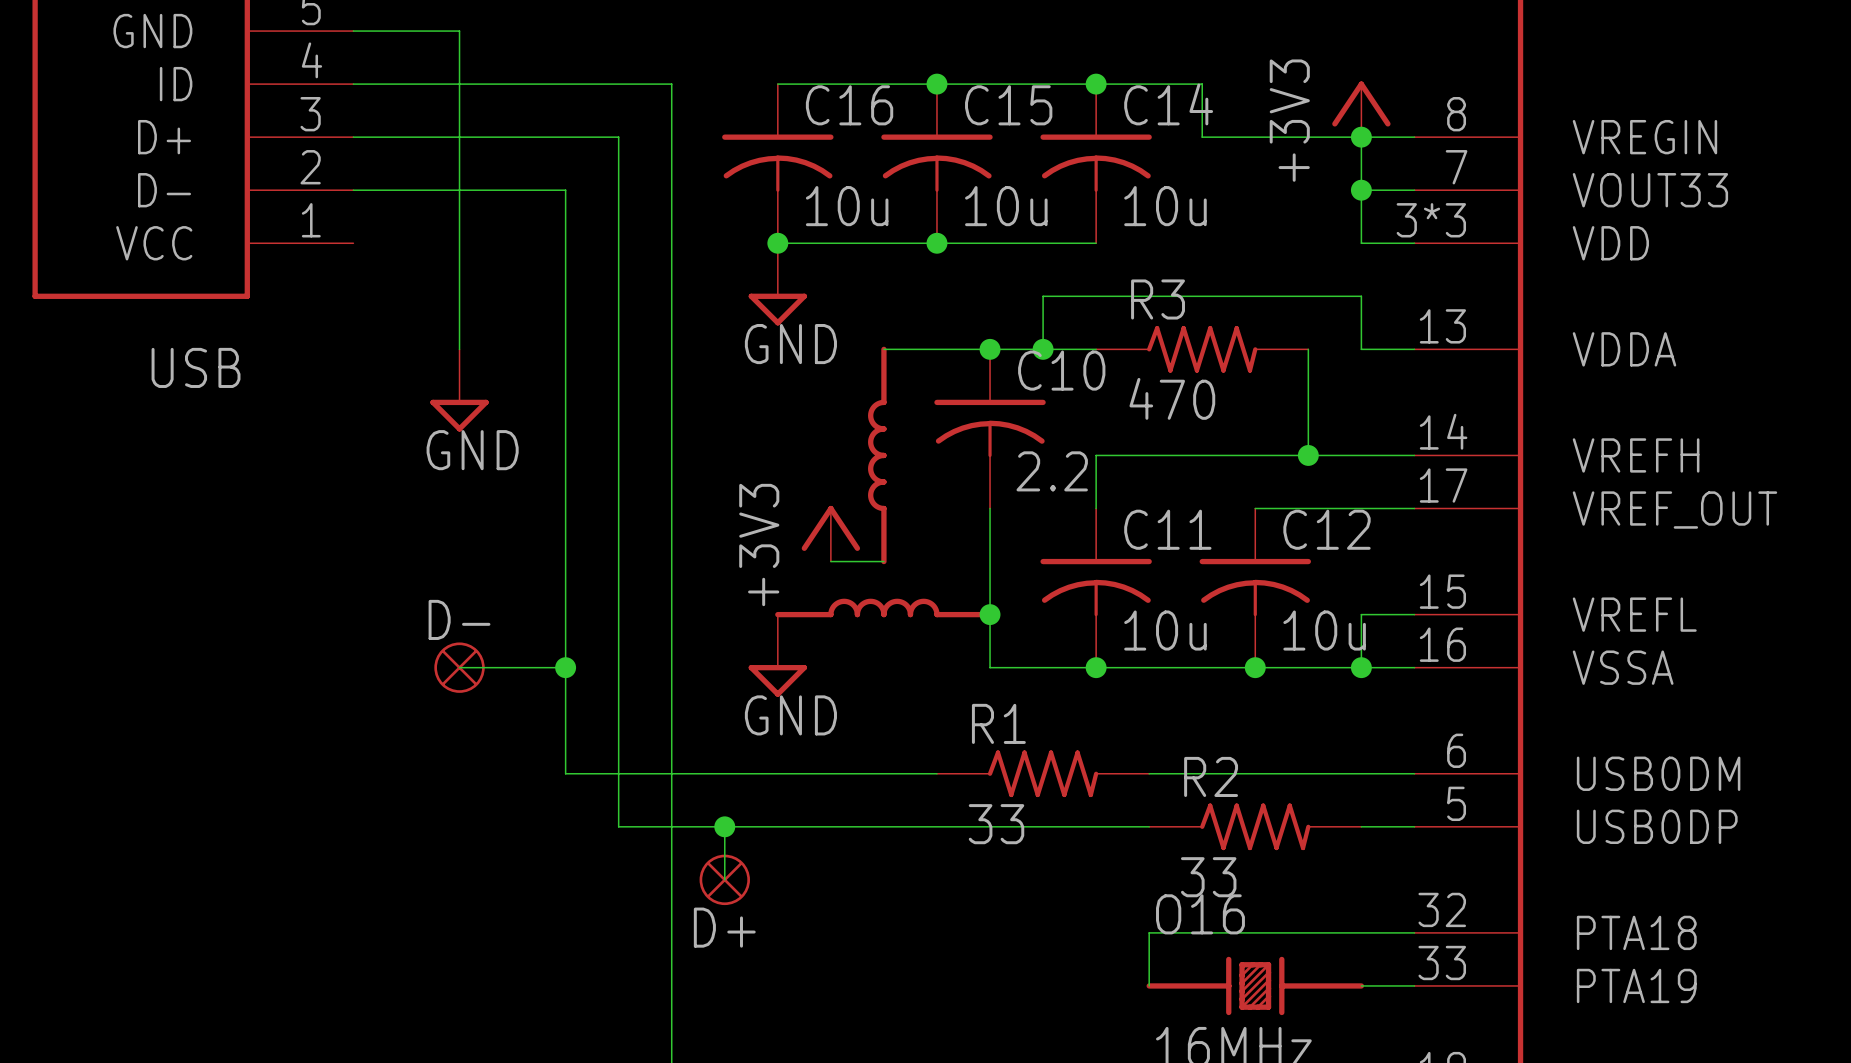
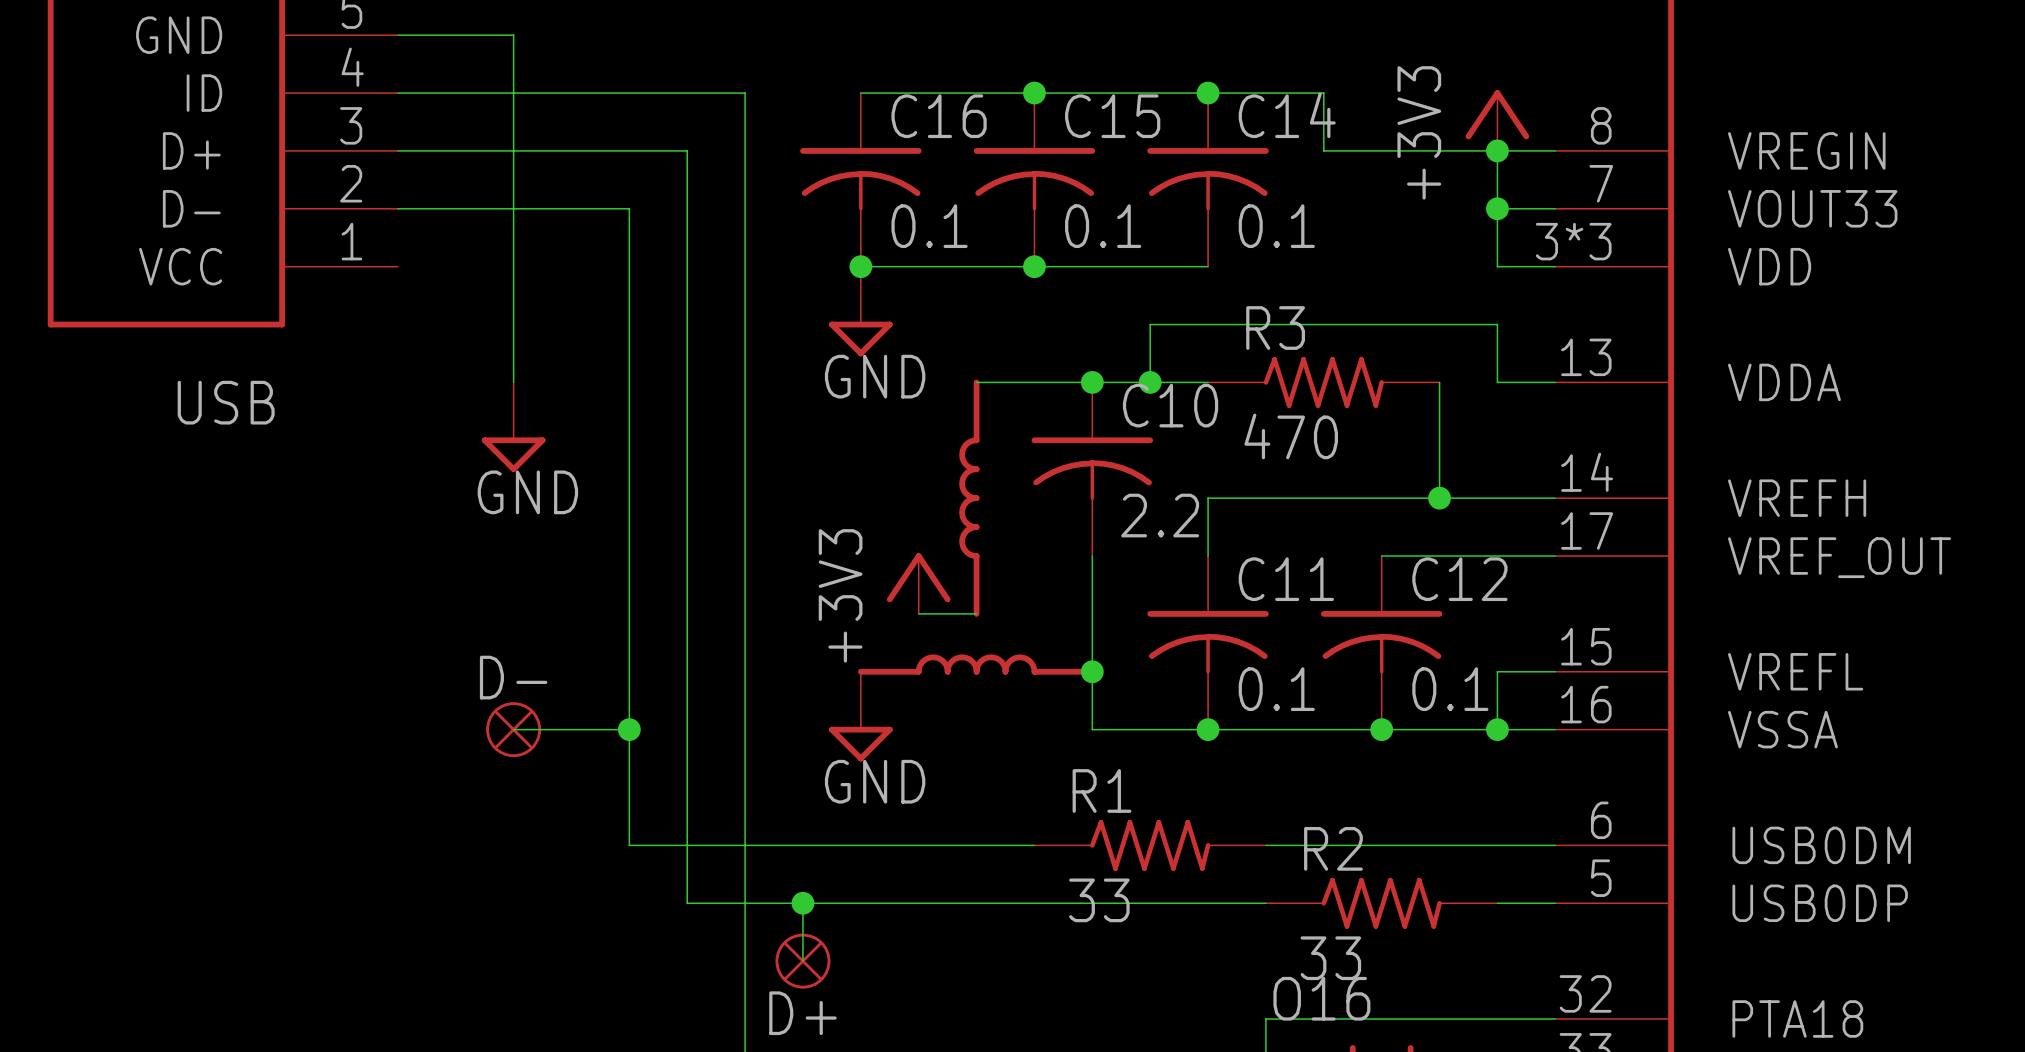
C16 value: 10u (847, 206) -> 0.1 (929, 226)
C15 value: 10u (1006, 206) -> 0.1 (1103, 226)
C14 value: 10u (1165, 206) -> 0.1 (1276, 226)
C11 value: 10u (1165, 630) -> 0.1 (1276, 689)
C12 value: 10u (1324, 630) -> 0.1 (1450, 689)

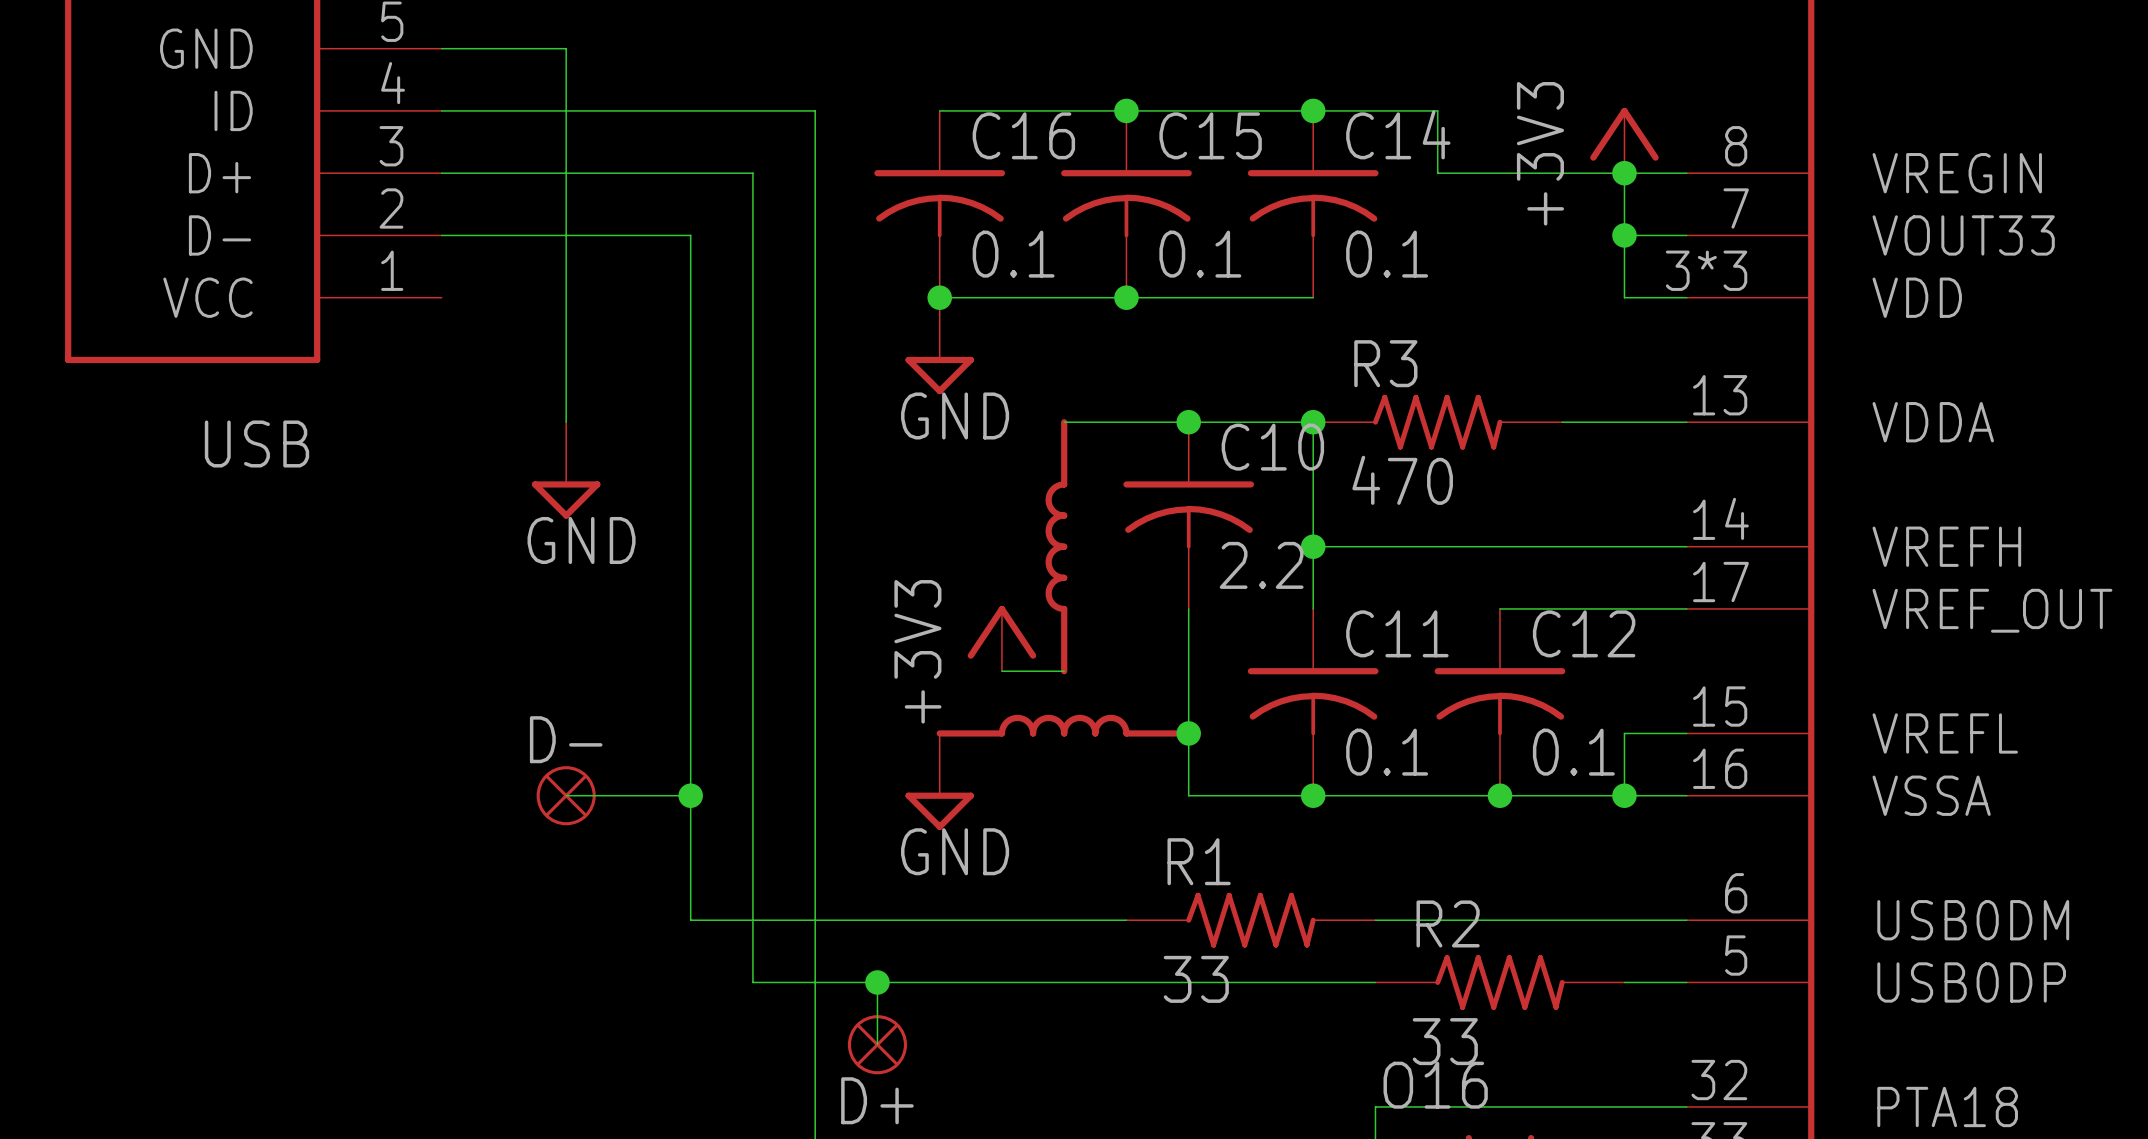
wire: (1150, 382) (1150, 324) (1497, 324) (1497, 382) -> none
junction position: (1150, 382) -> (1313, 422)
wire: none -> (1313, 422) (1313, 546)
wire: (1439, 382) (1439, 498) -> (1562, 422) (1624, 422)
junction: none -> (1313, 546)
junction: (1439, 498) -> none

